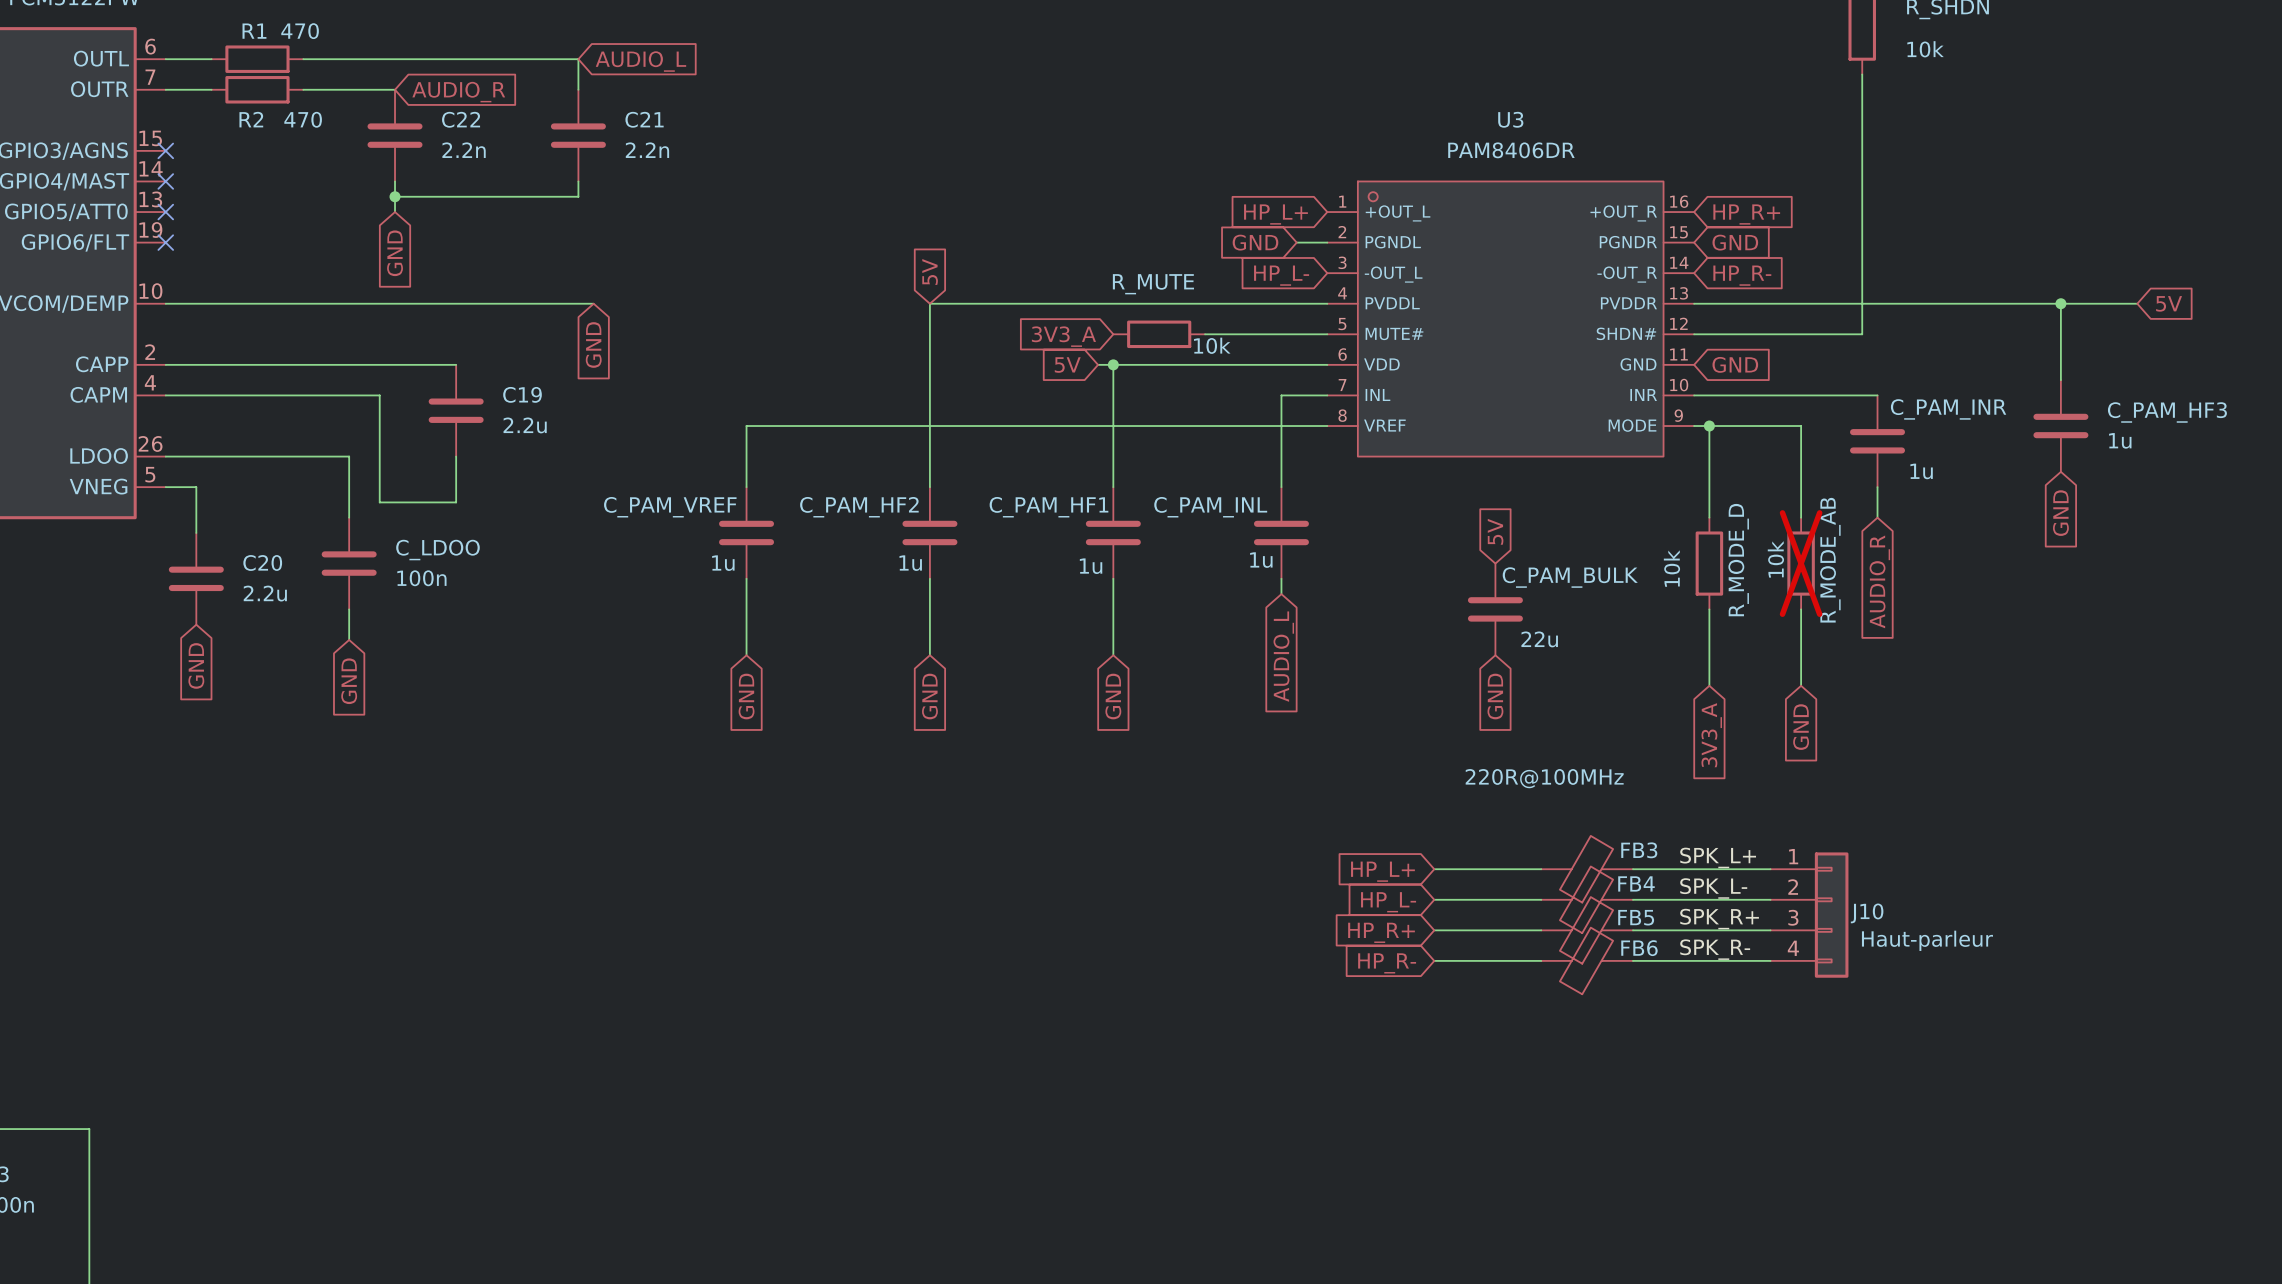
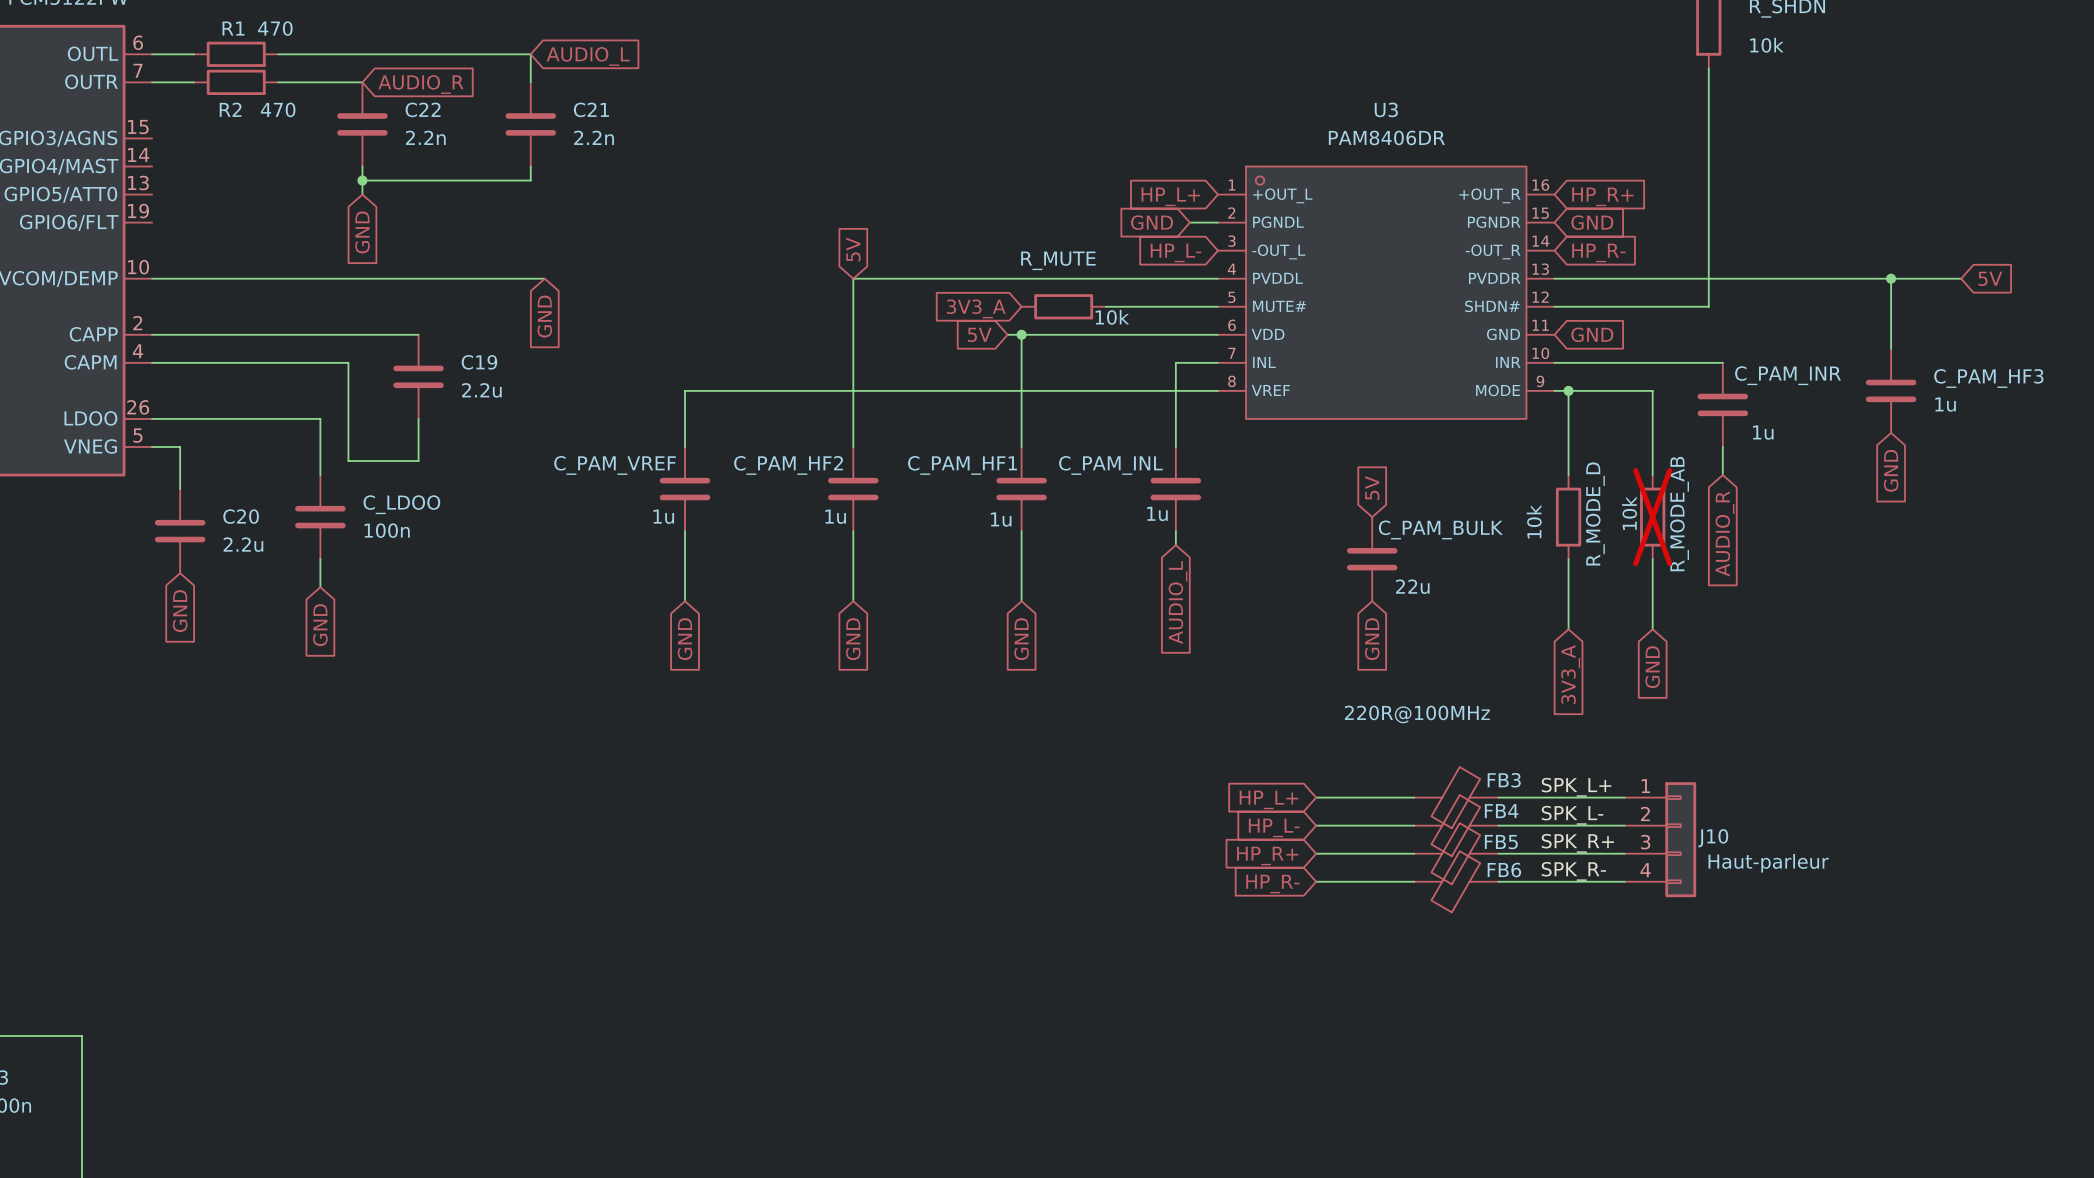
no-connect mark: (165, 150) -> none
no-connect mark: (165, 181) -> none
no-connect mark: (165, 212) -> none
no-connect mark: (165, 242) -> none

